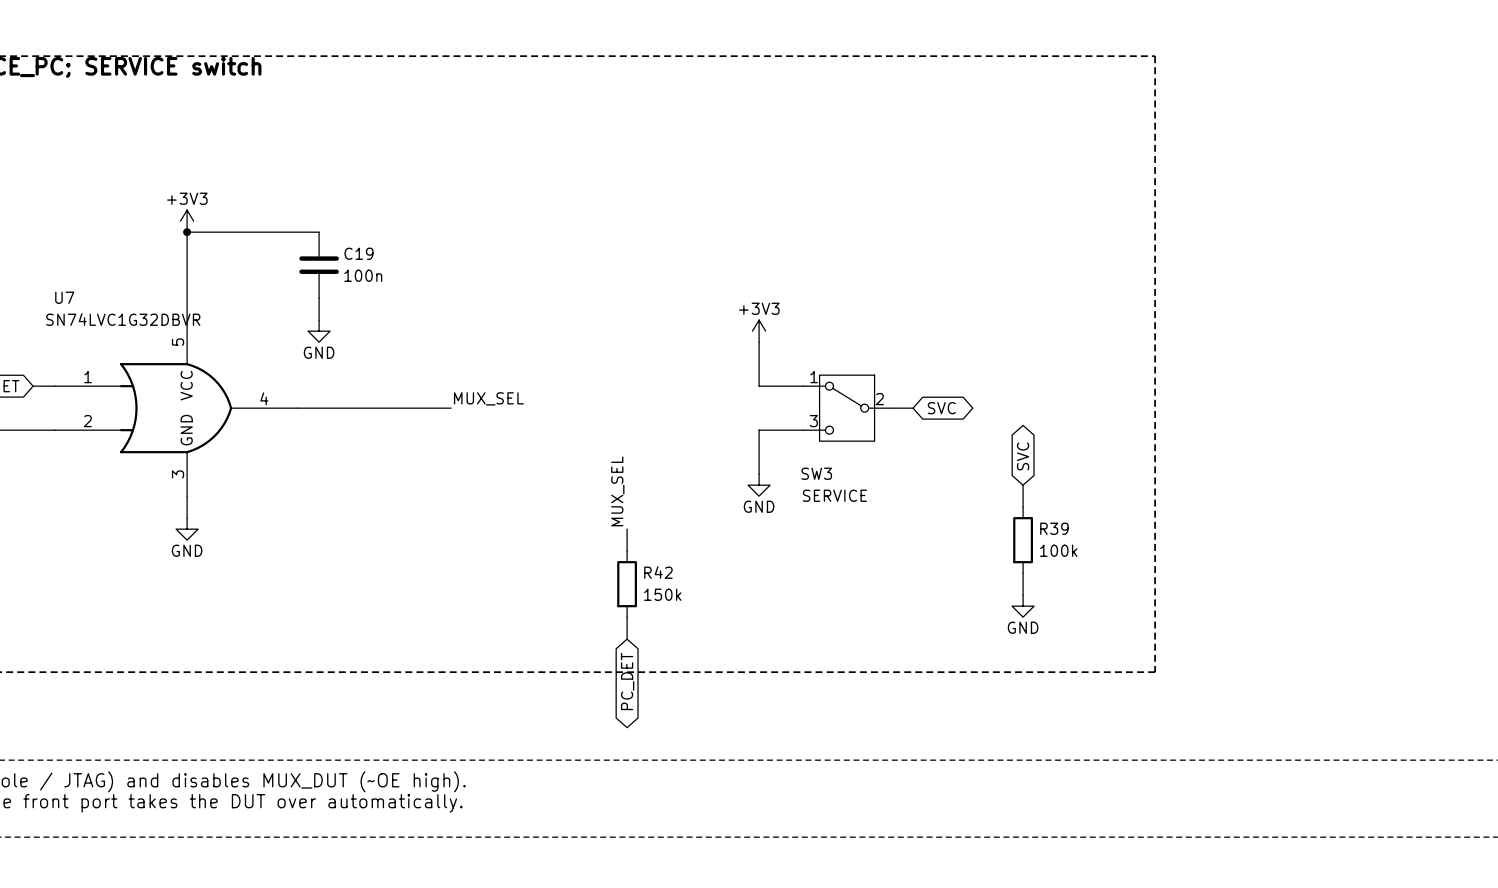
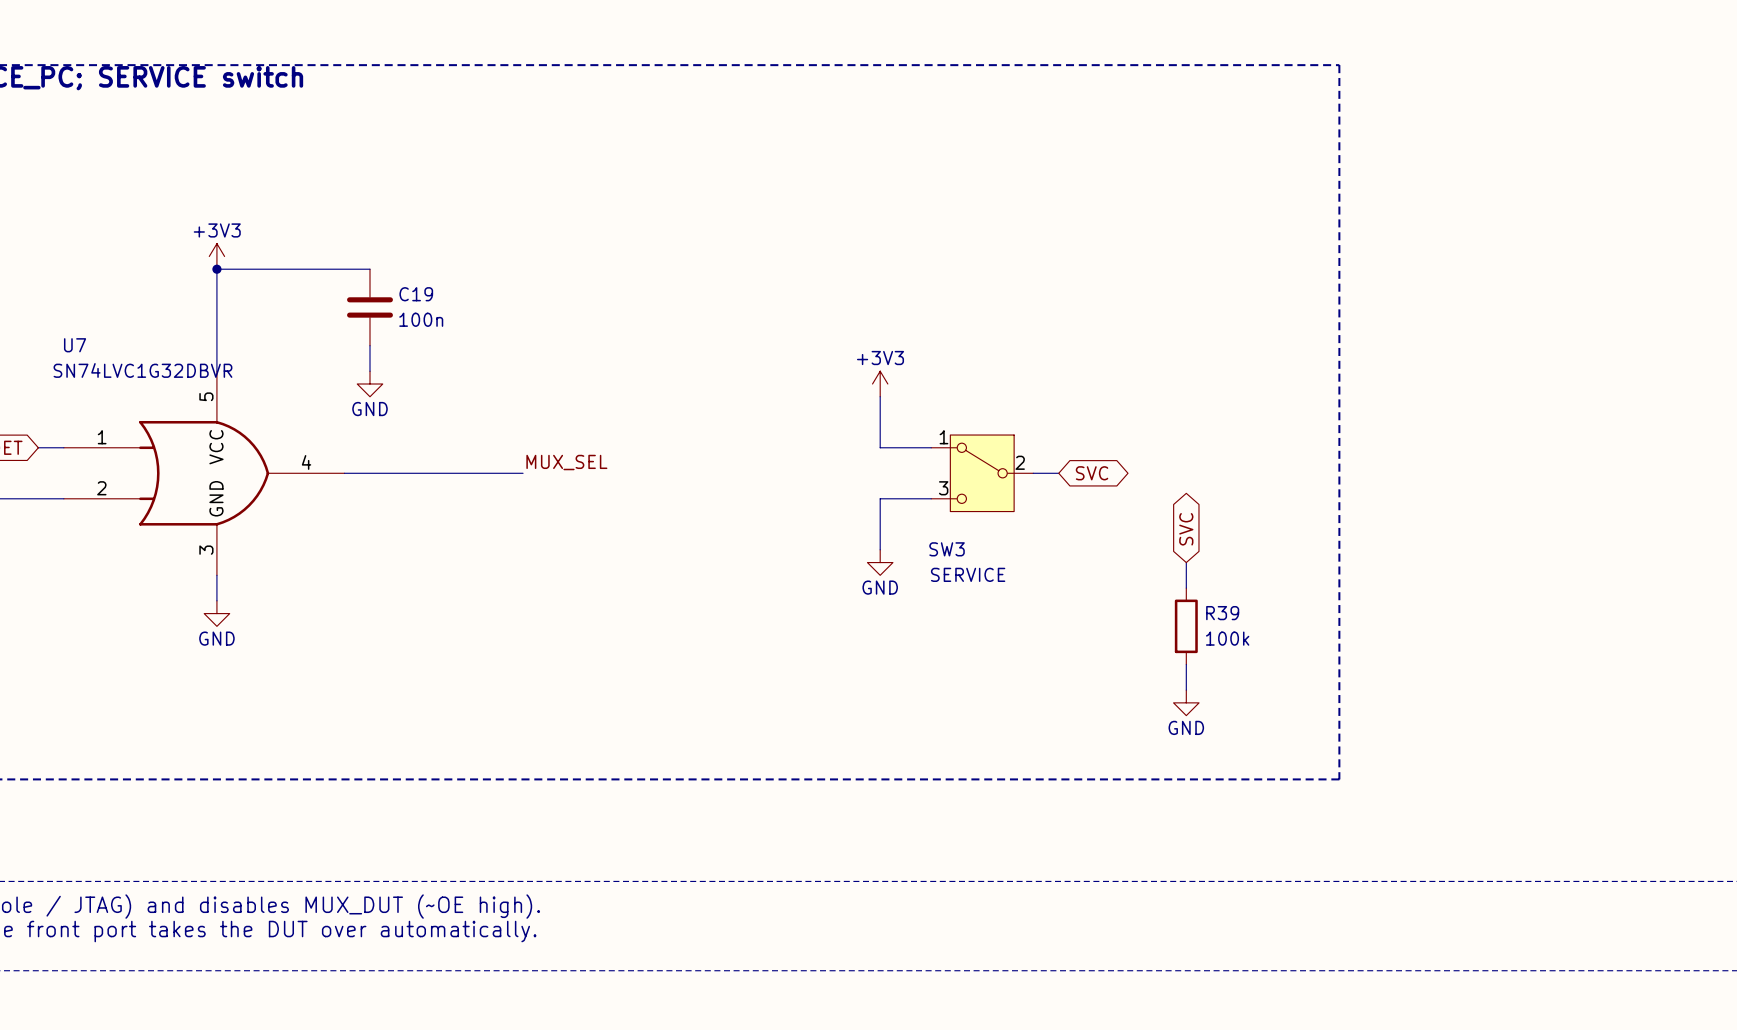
label: MUX_SEL (617, 491) -> none
wire: (627, 529) (627, 551) -> none
R42: 150k (627, 584) -> none
wire: (627, 617) (627, 639) -> none
global label: PC_DET (627, 681) -> none

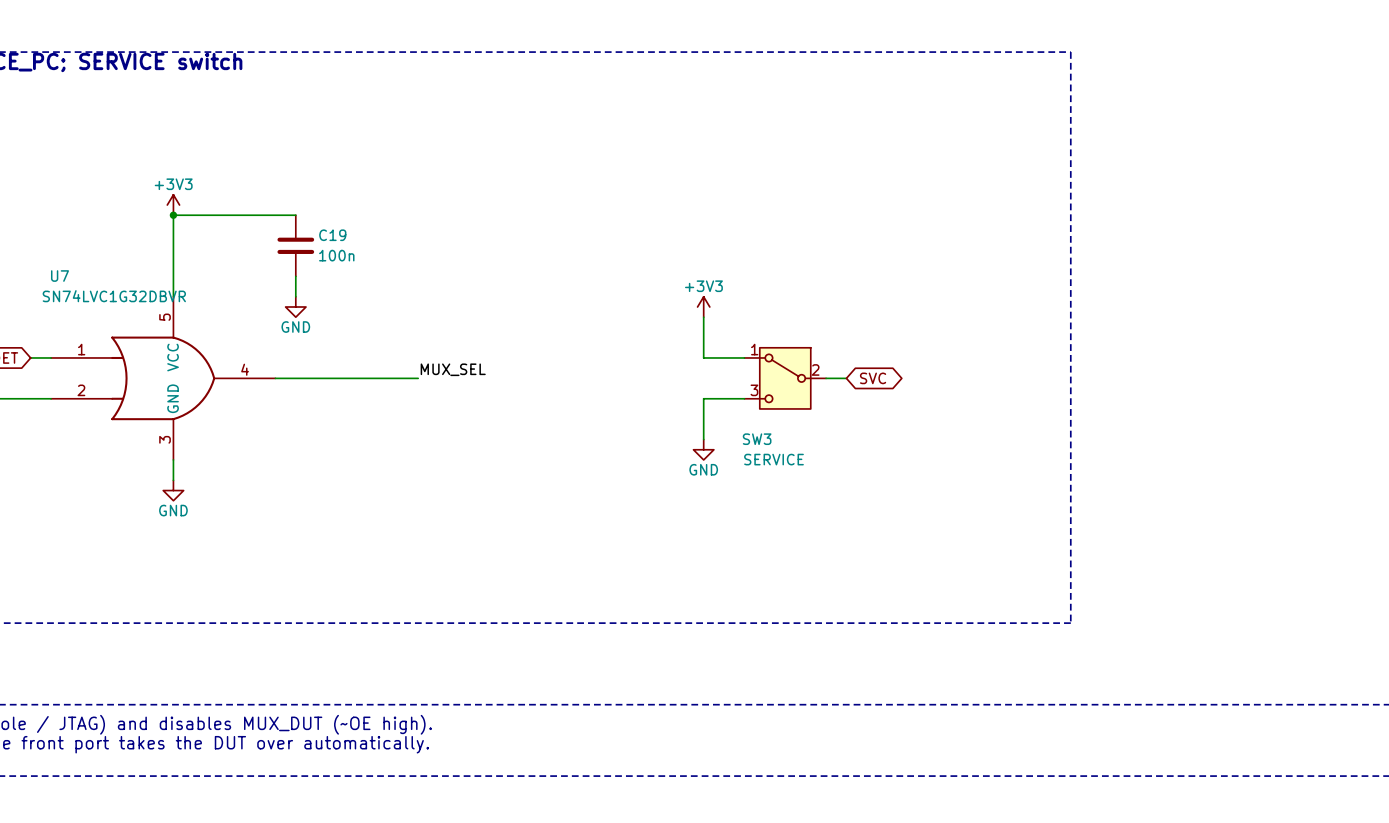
global label: SVC (1186, 529) -> none
wire: (1186, 562) (1186, 588) -> none
R39: 100k (1186, 626) -> none
wire: (1186, 664) (1186, 690) -> none
power symbol: GND (1186, 702) -> none

